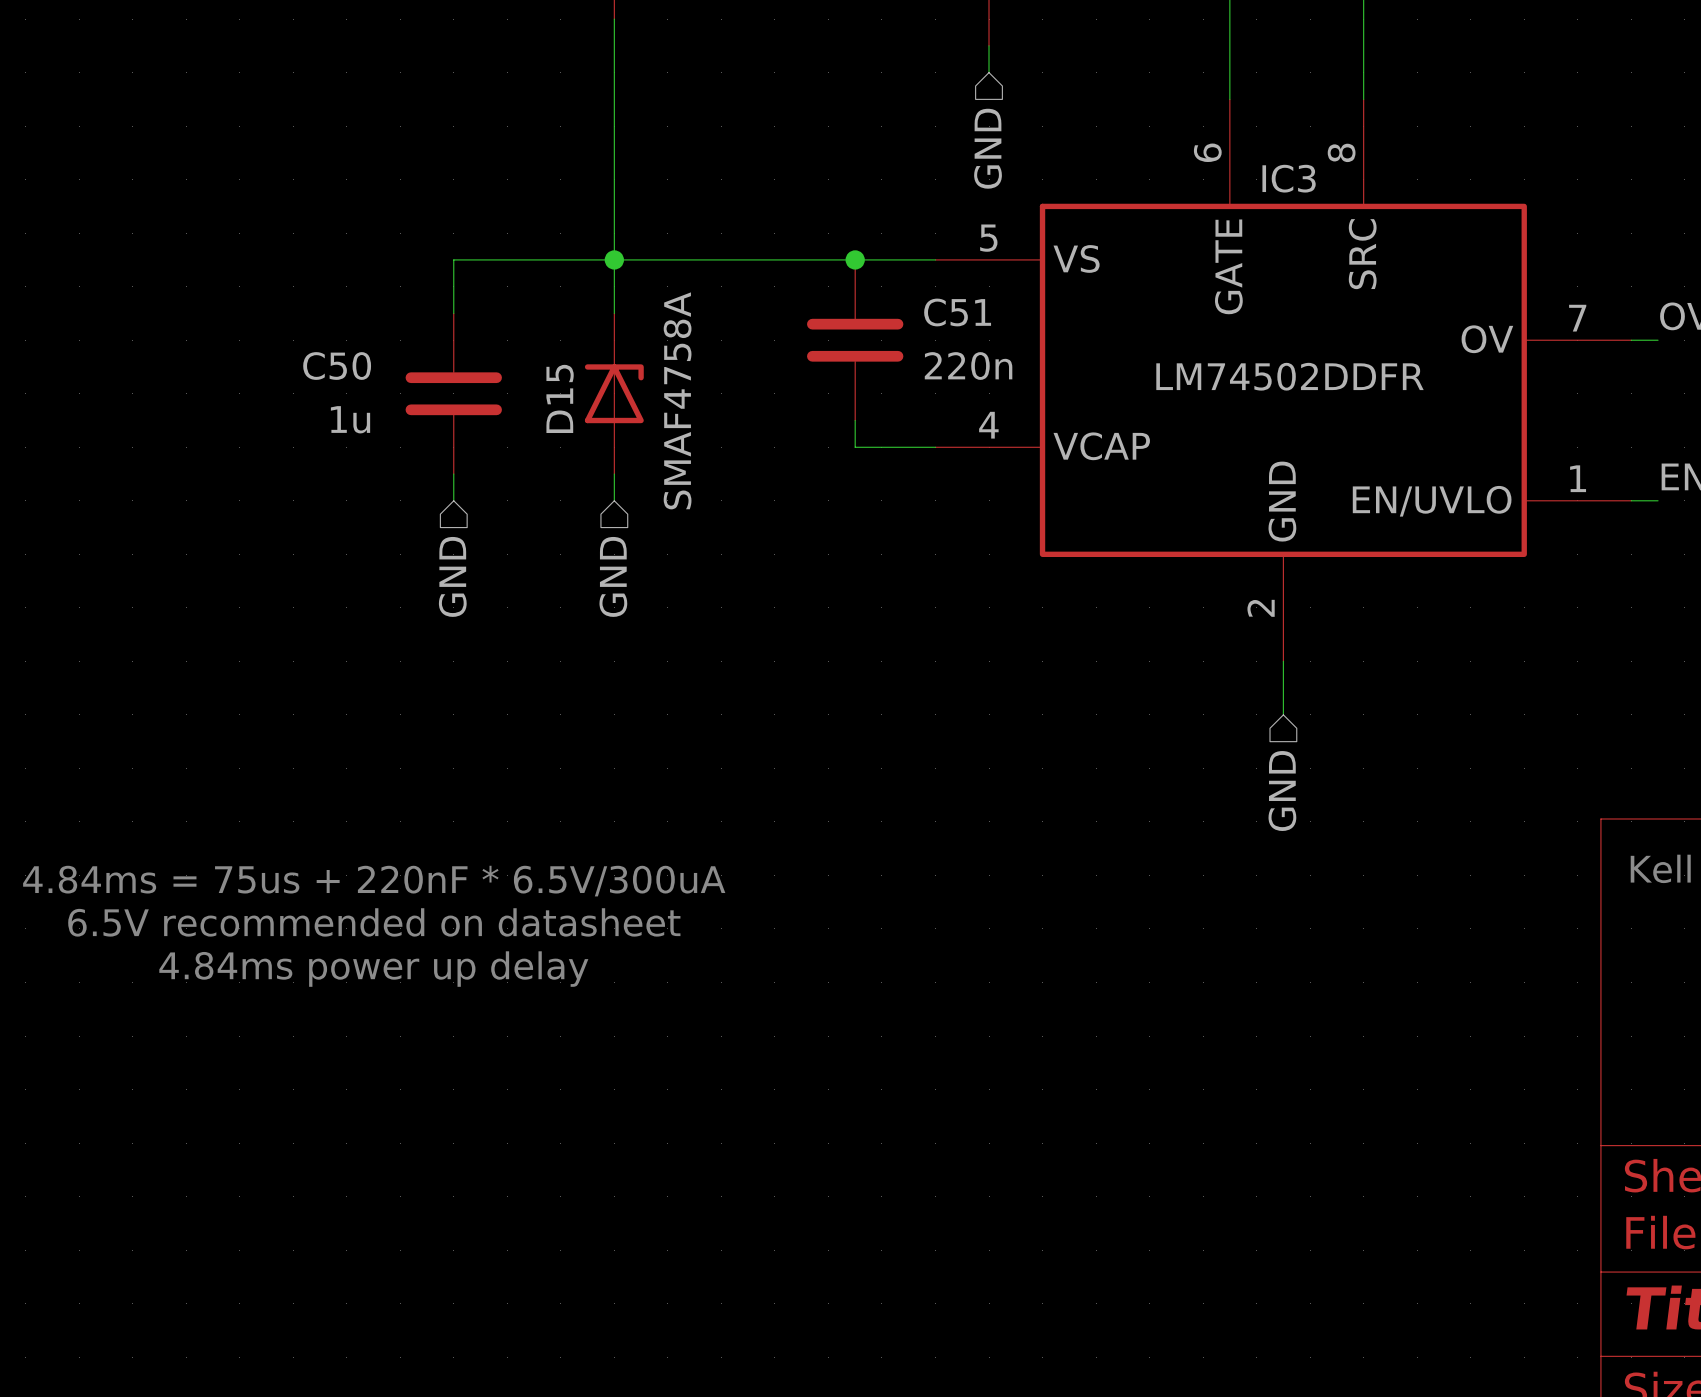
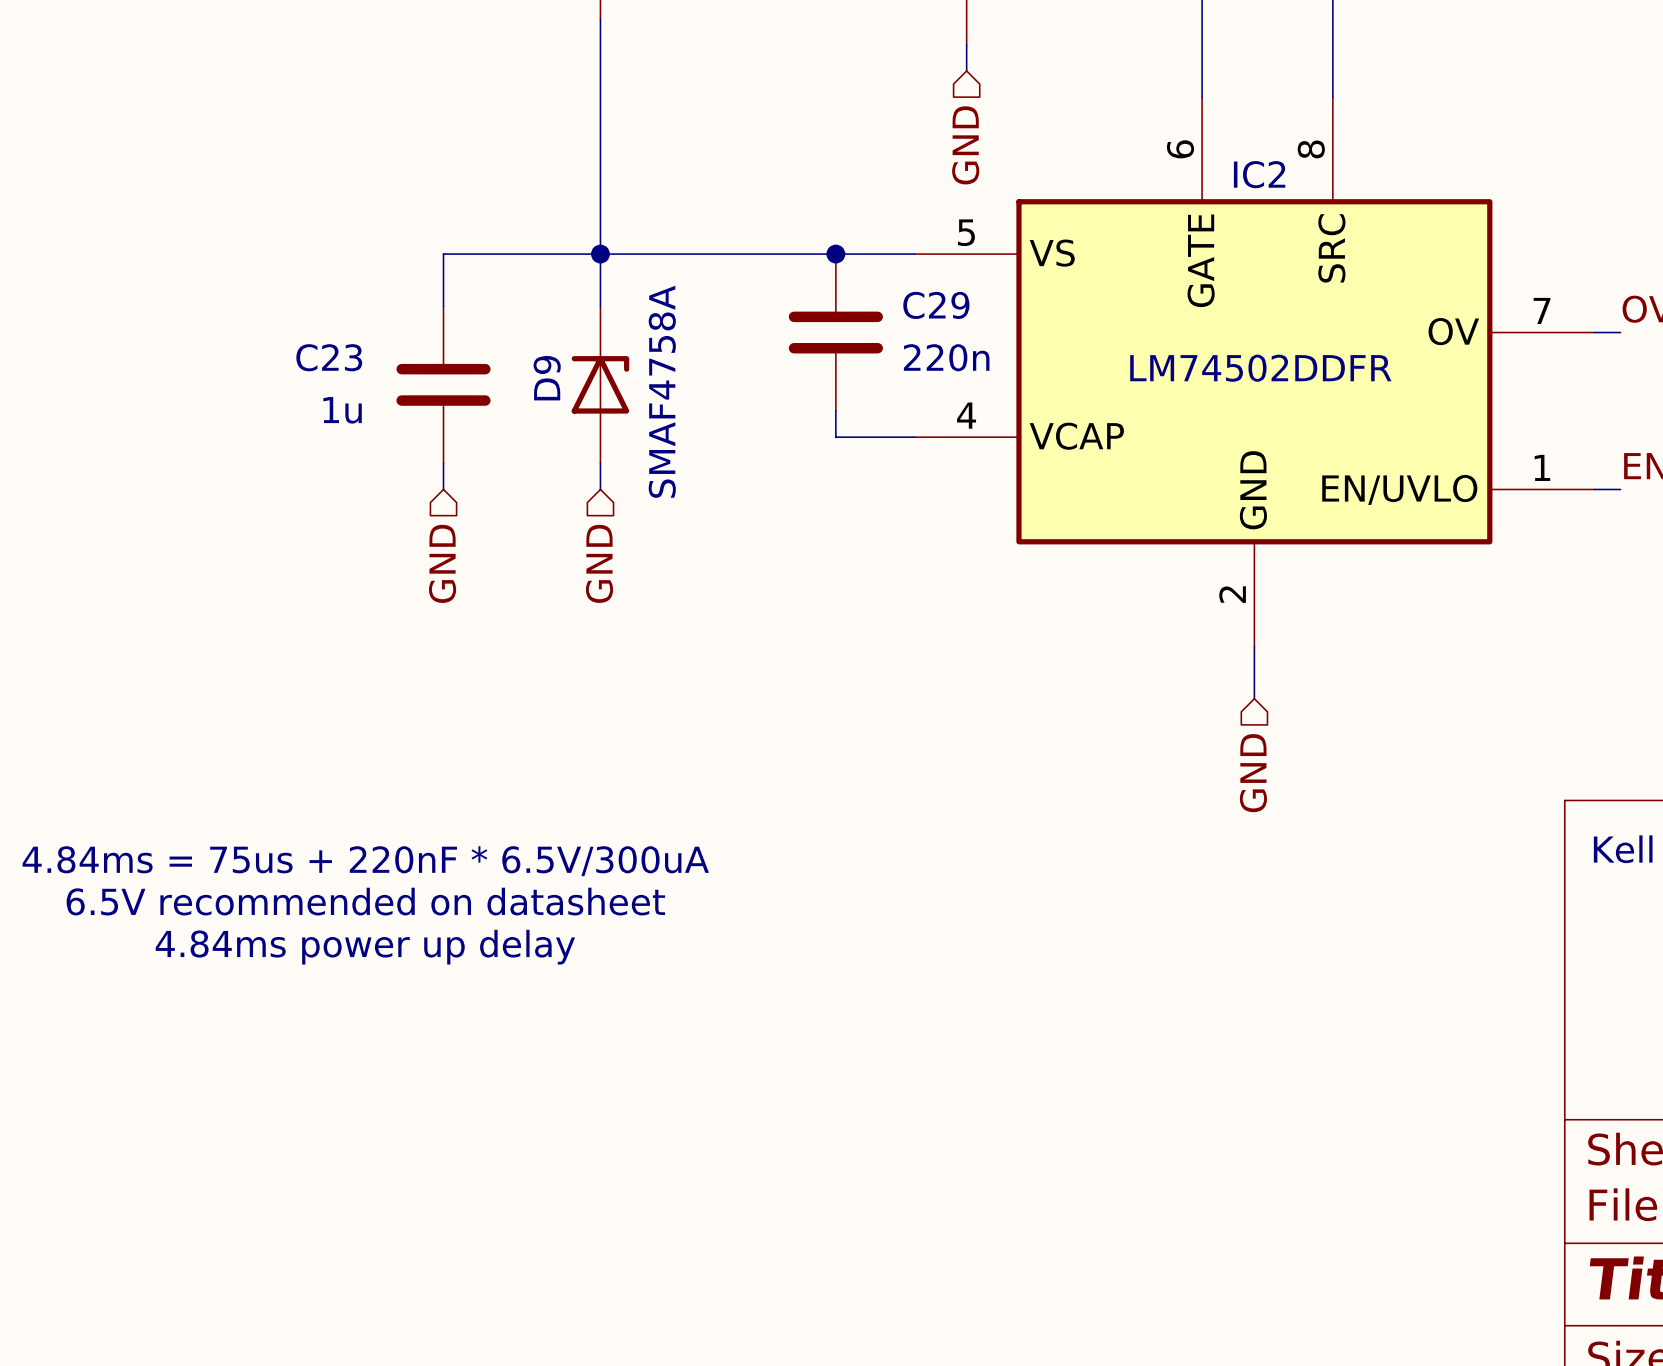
IC3 name: IC3 (1289, 178) -> IC2 (1259, 174)
C51 name: C51 (957, 312) -> C29 (936, 305)
C50 name: C50 (337, 366) -> C23 (329, 357)
D15 name: D15 (560, 398) -> D9 (547, 378)

